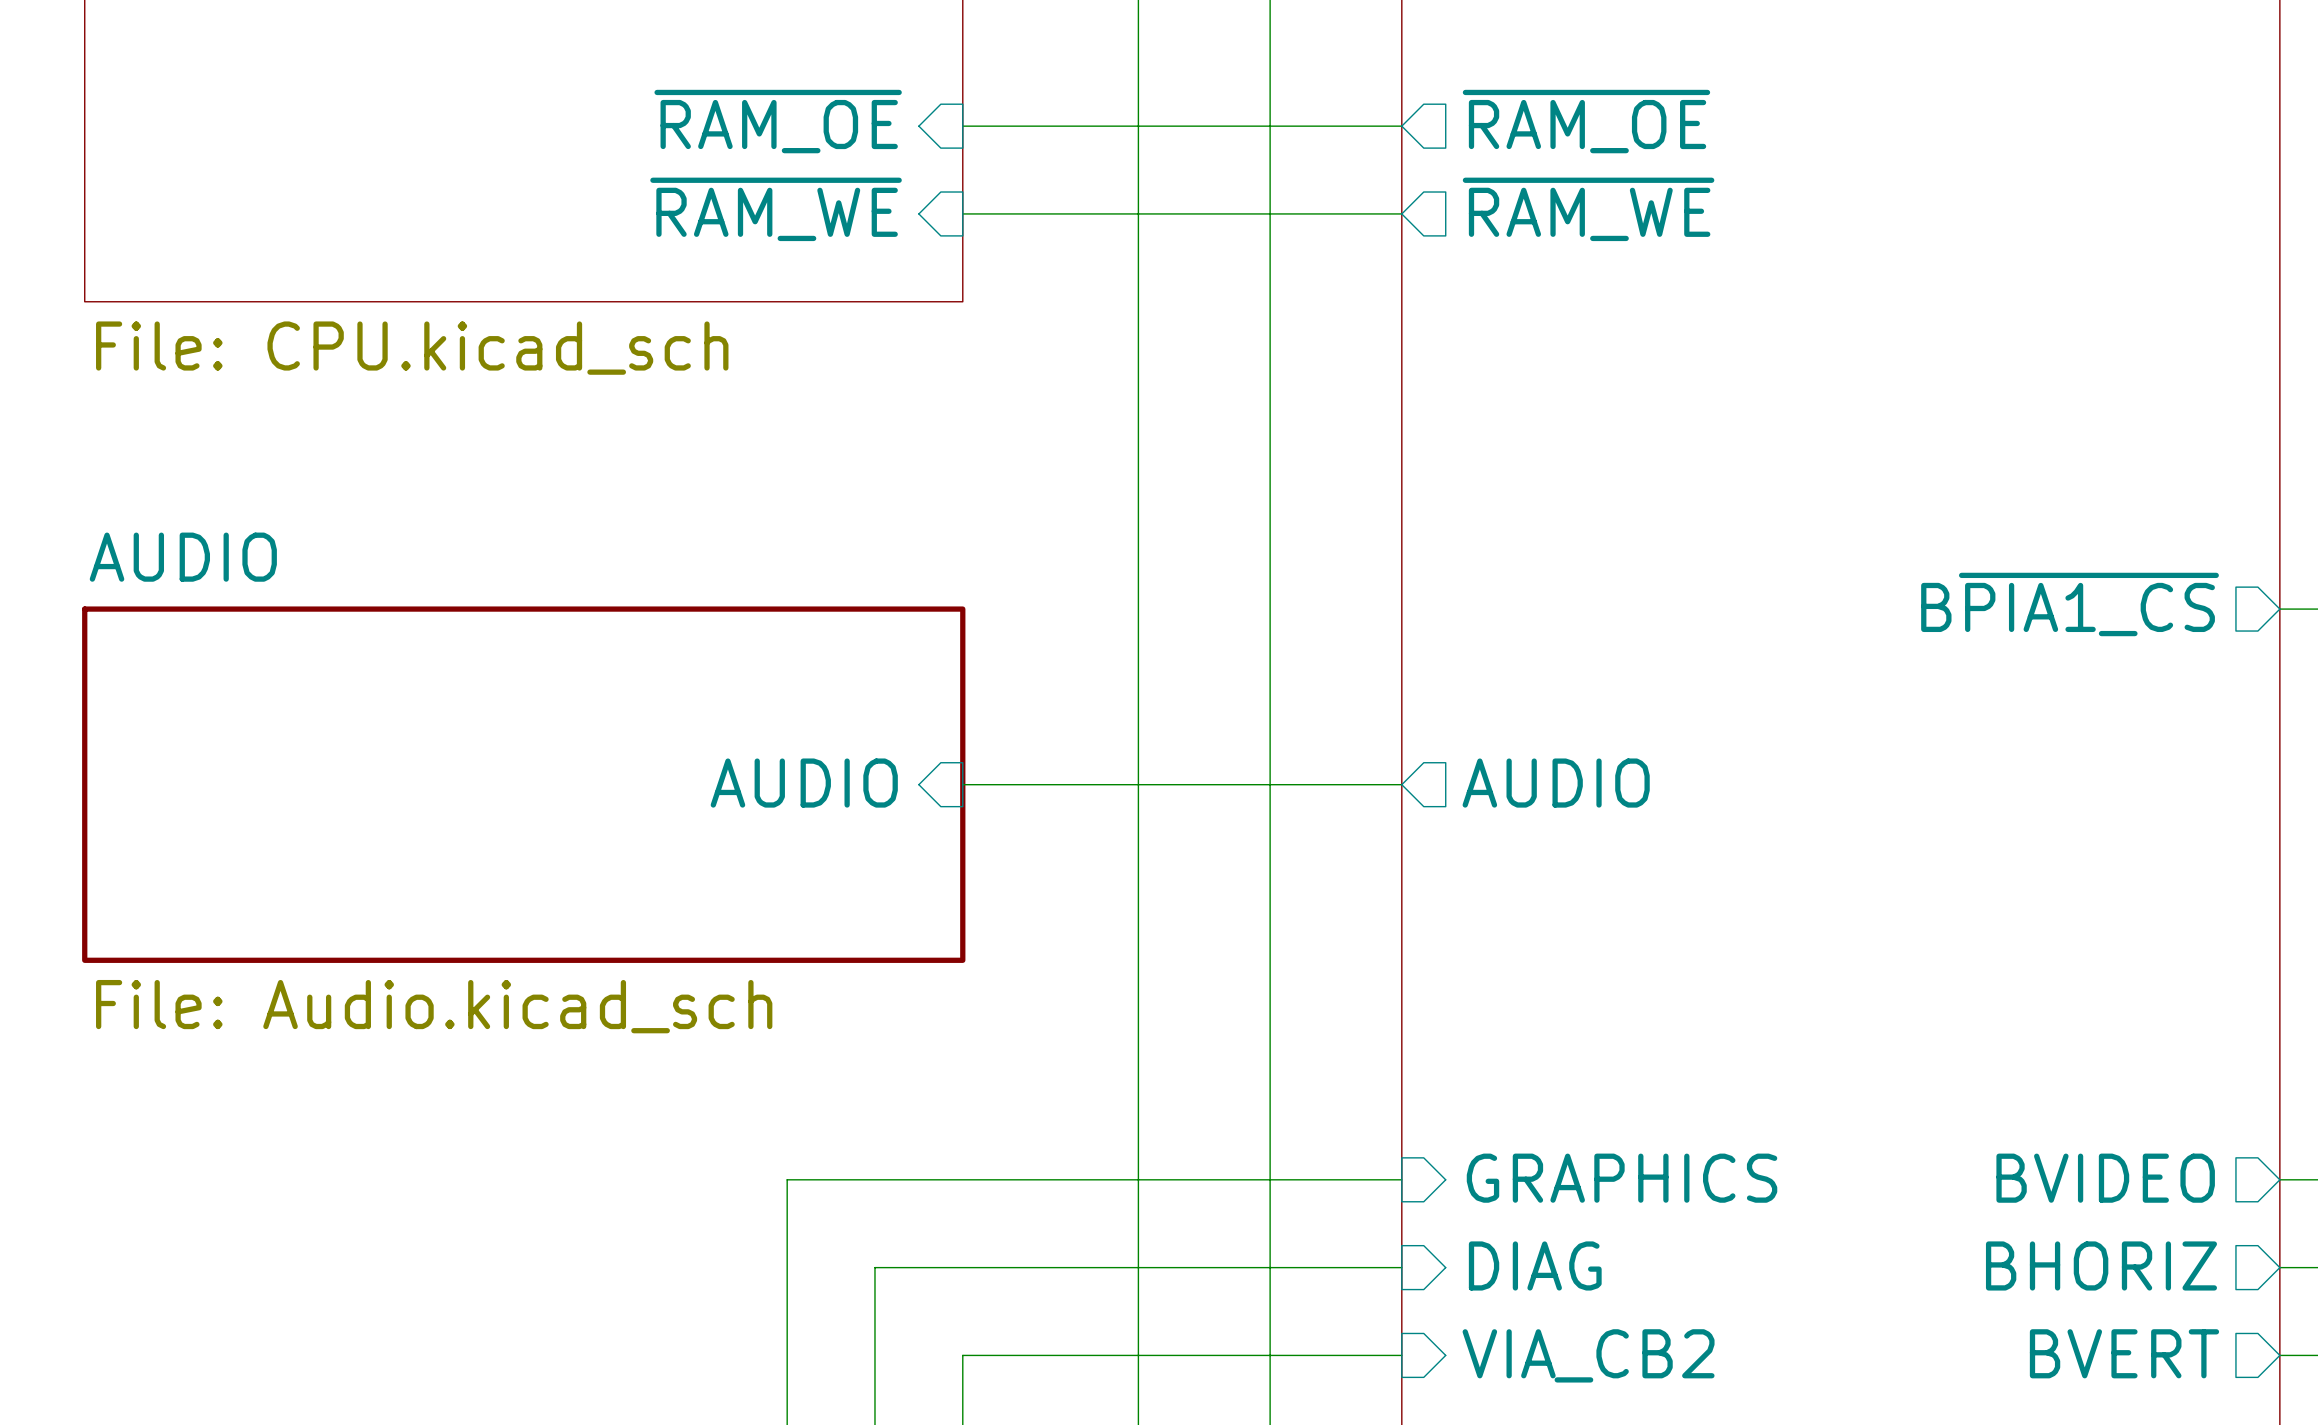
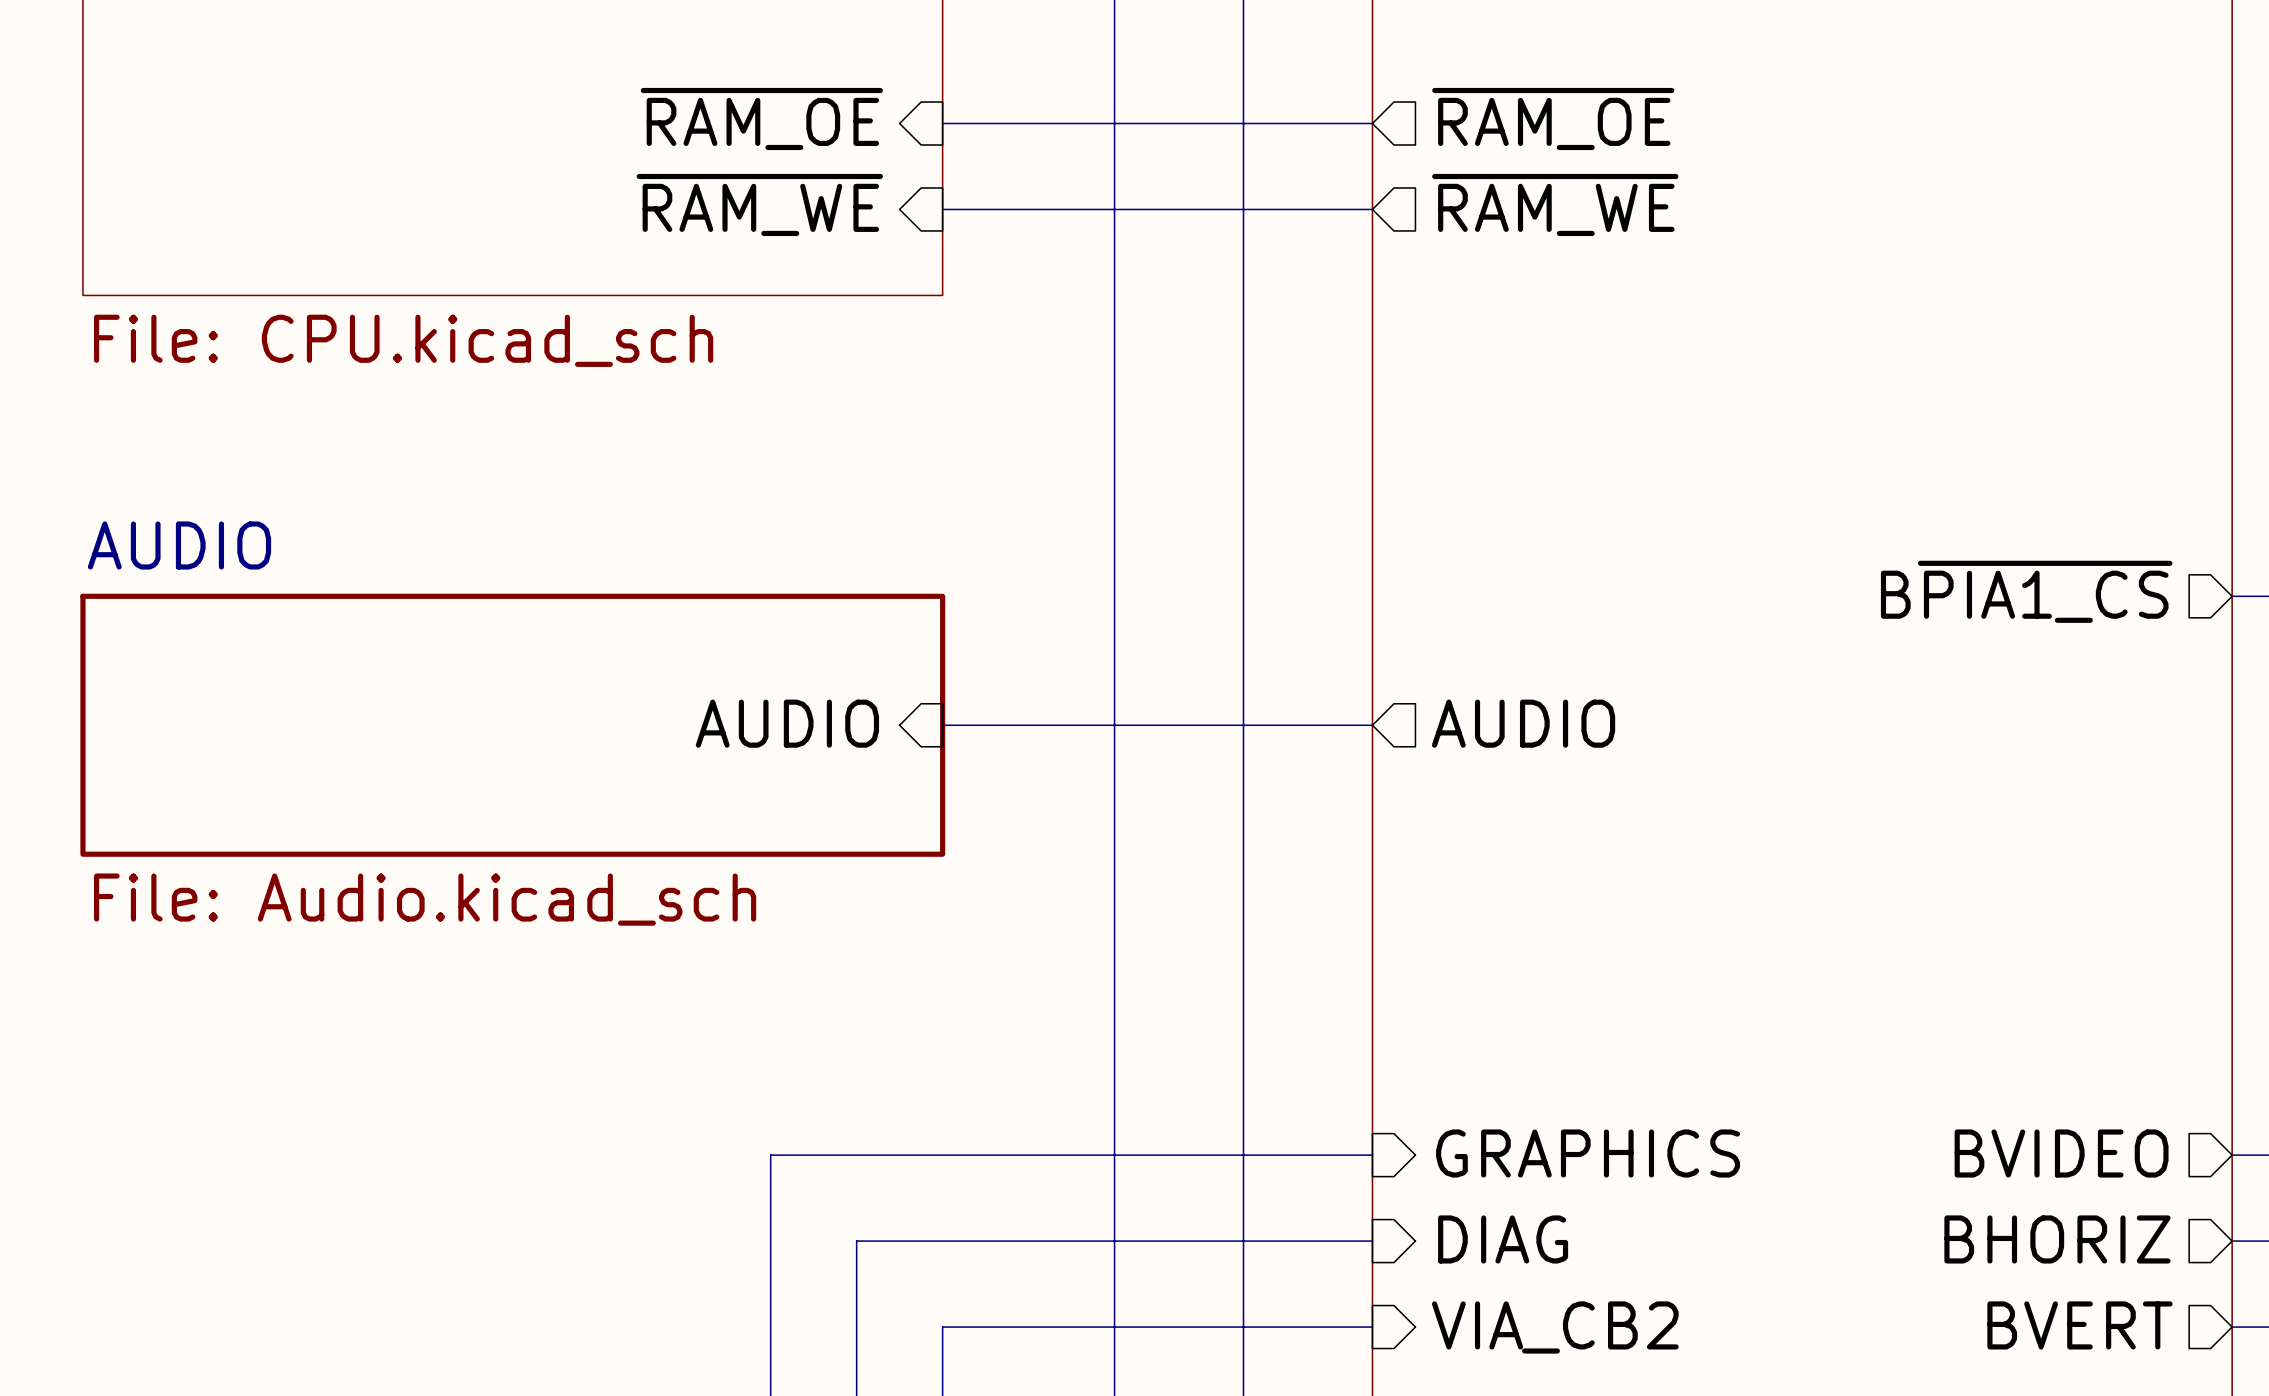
sheet AUDIO: none -> File: Audio.kicad_sch (512, 725)
sheet pin position: AUDIO (804, 783) -> AUDIO (787, 723)
sheet pin position: AUDIO (1556, 783) -> AUDIO (1523, 723)
sheet AUDIO: File: Audio.kicad_sch (523, 784) -> none
wire: (962, 784) (1401, 784) -> (942, 725) (1372, 725)

